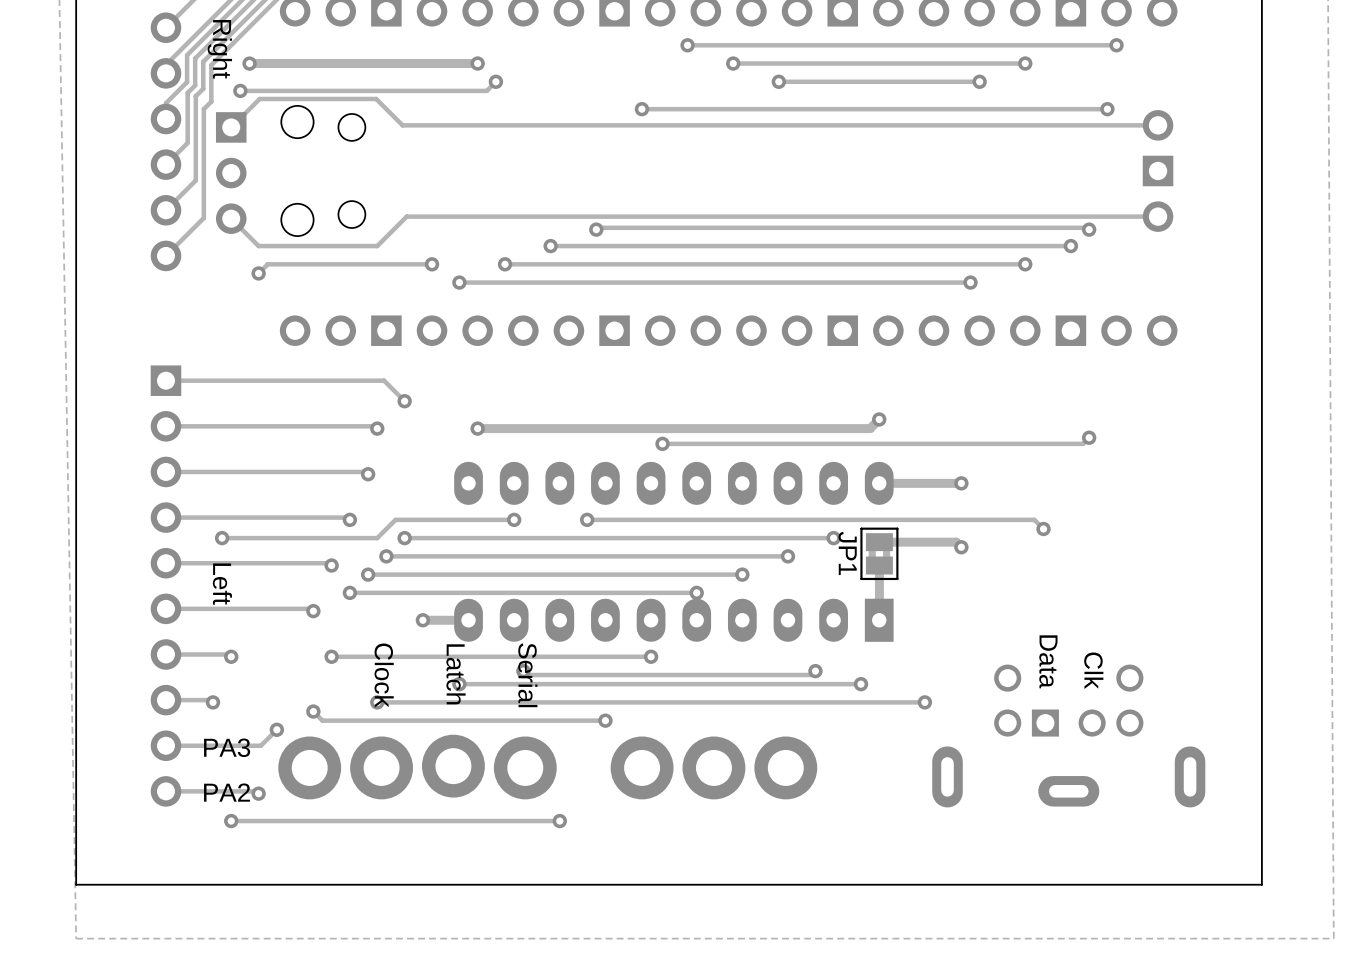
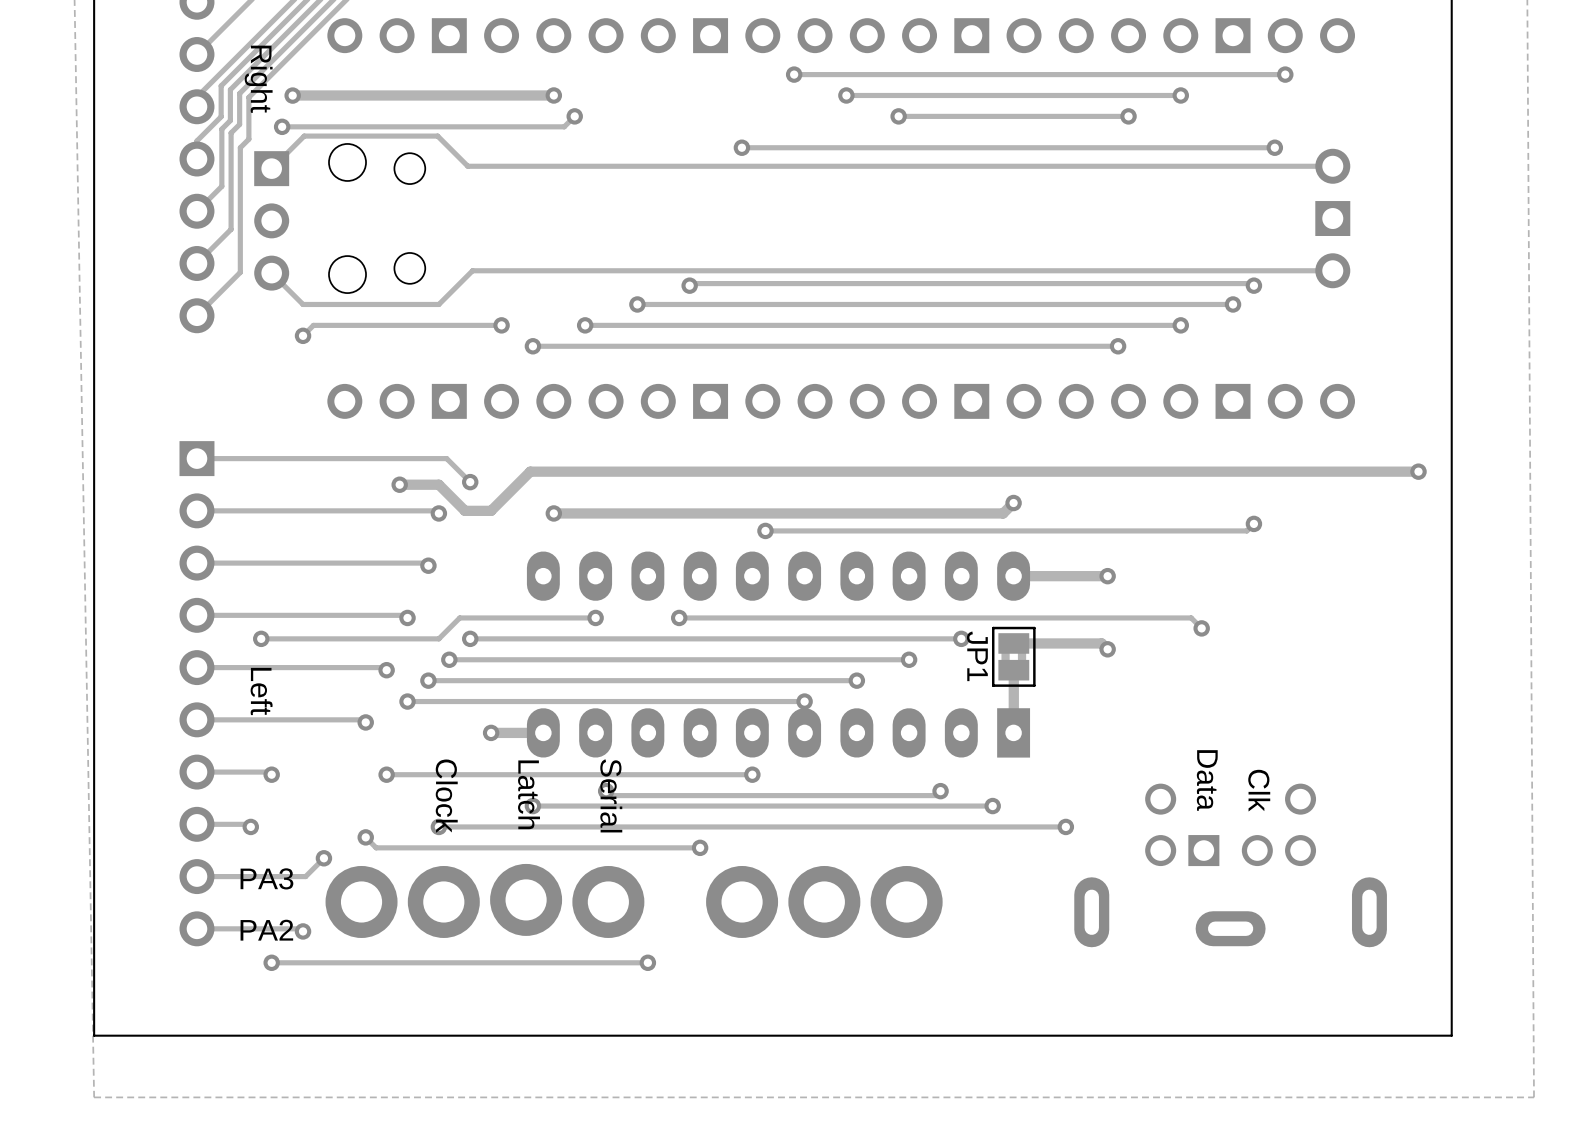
track: none -> (1418, 471) (530, 471) (491, 510) (465, 510) (438, 484) (399, 484)
via: none -> (1418, 471)
via: none -> (399, 484)

